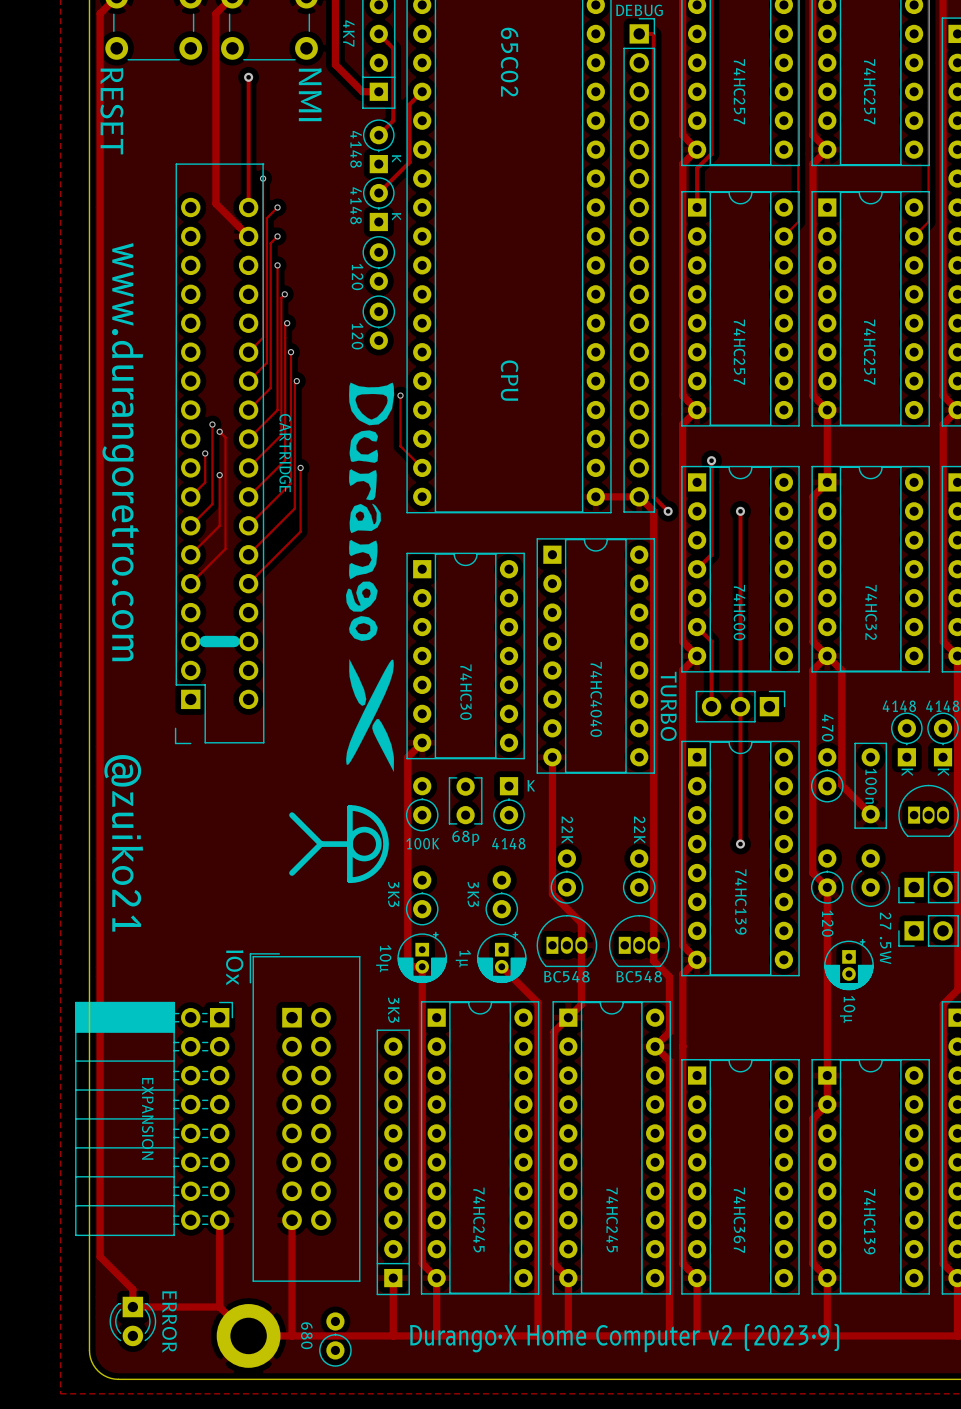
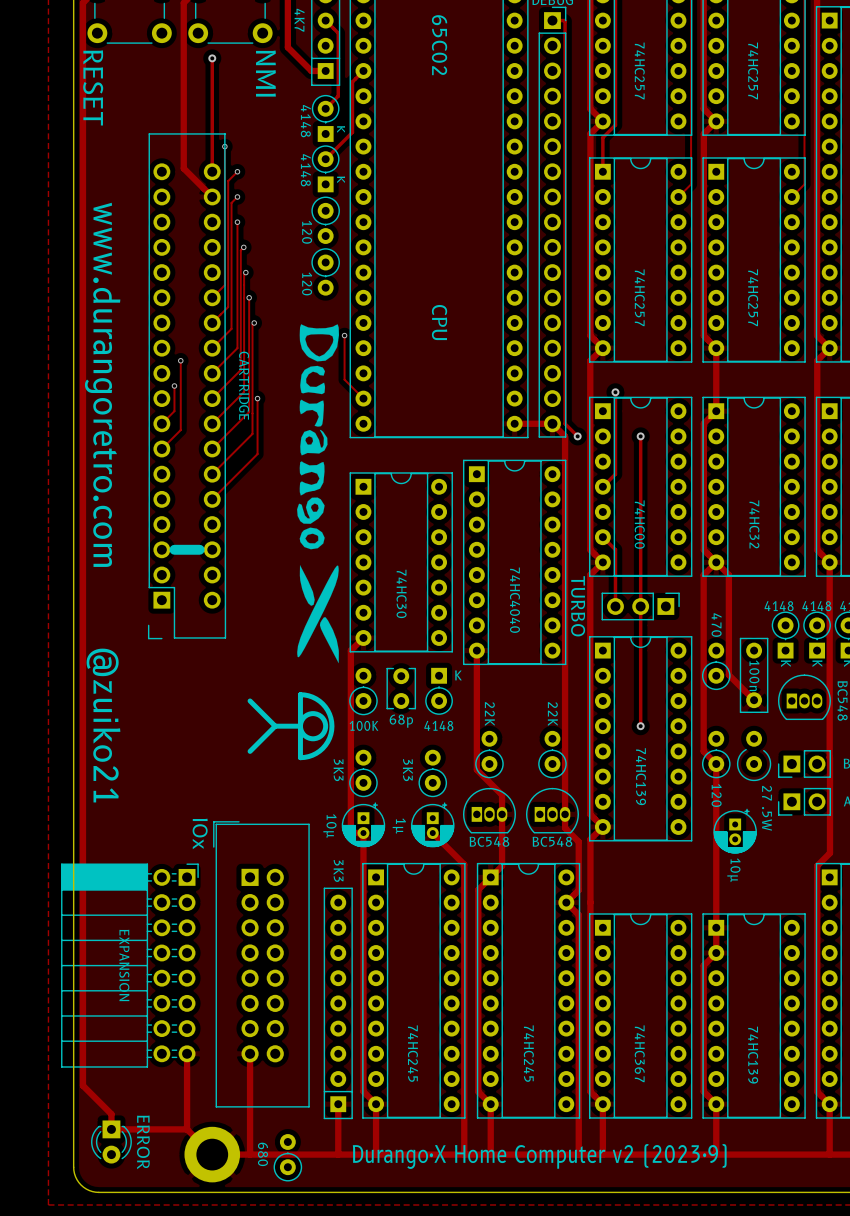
track: (219, 431) (225, 437) (225, 548) (190, 583) -> none
via: (219, 431) -> none
track: (219, 475) (219, 525) (190, 554) -> none
via: (219, 475) -> none

